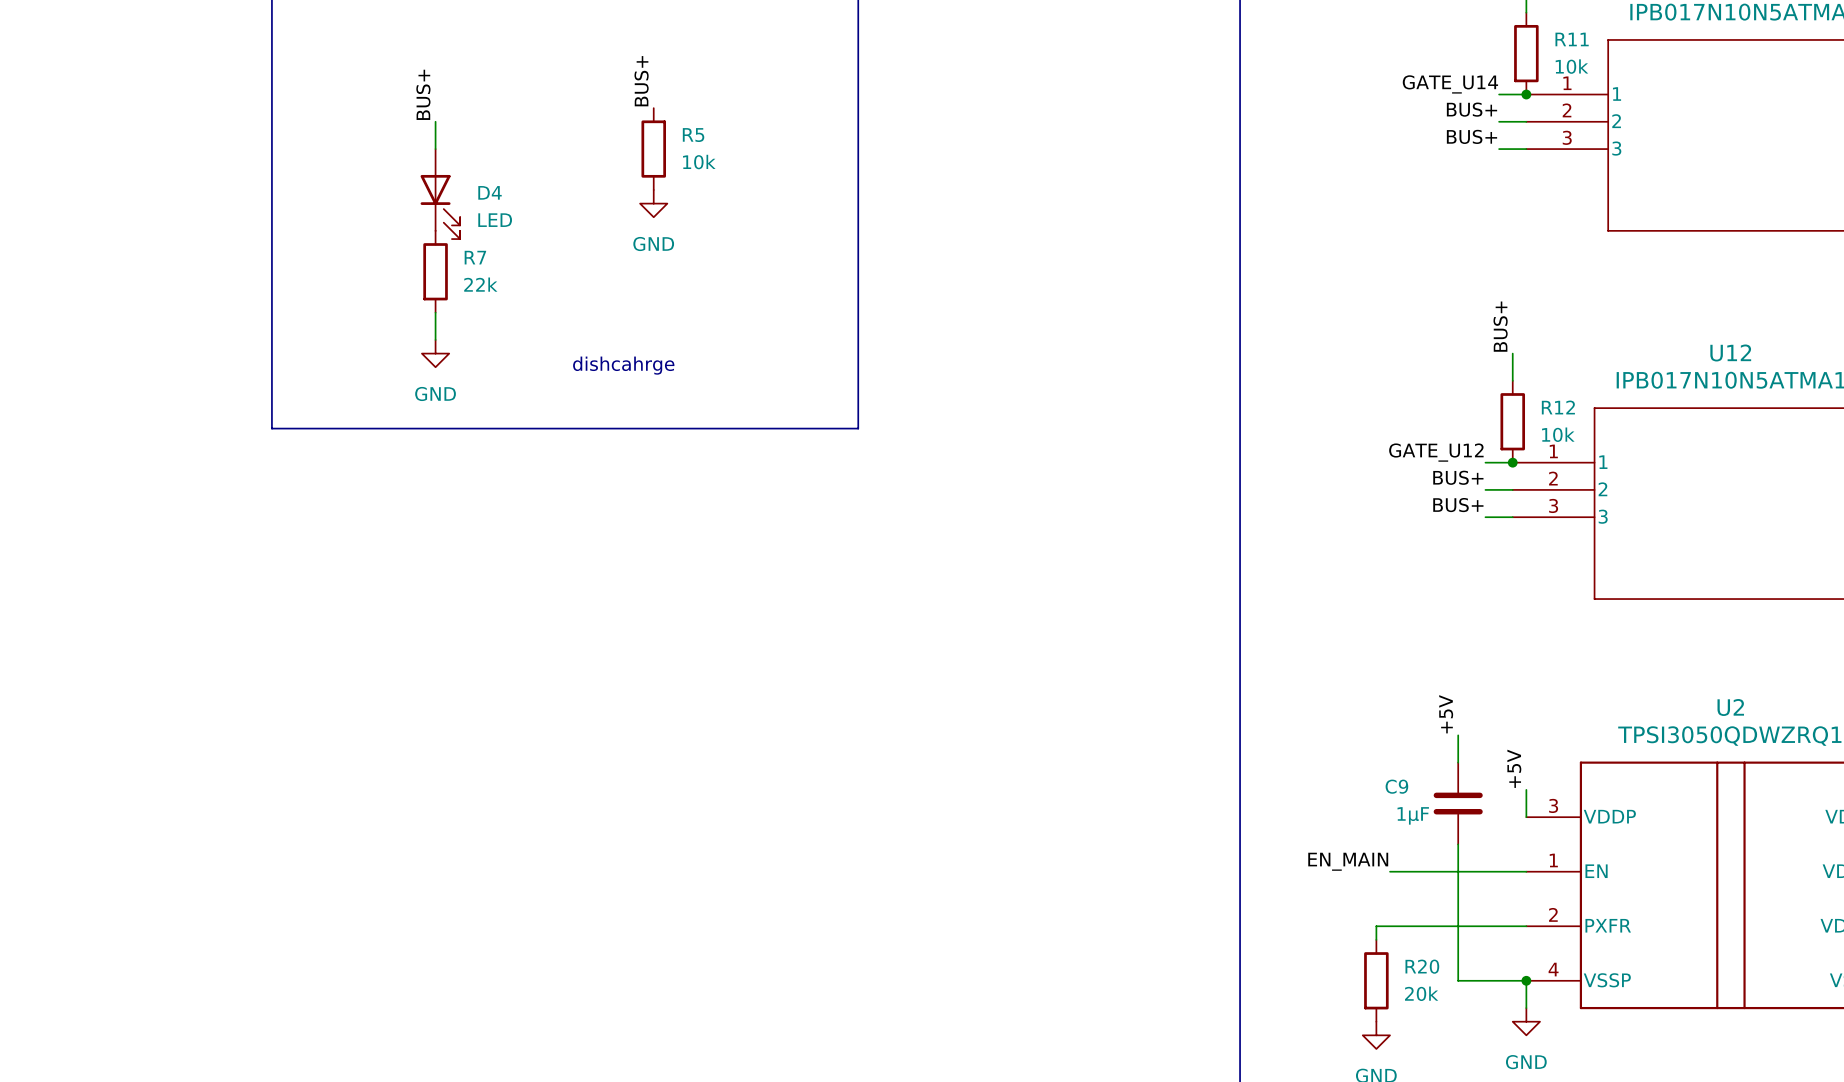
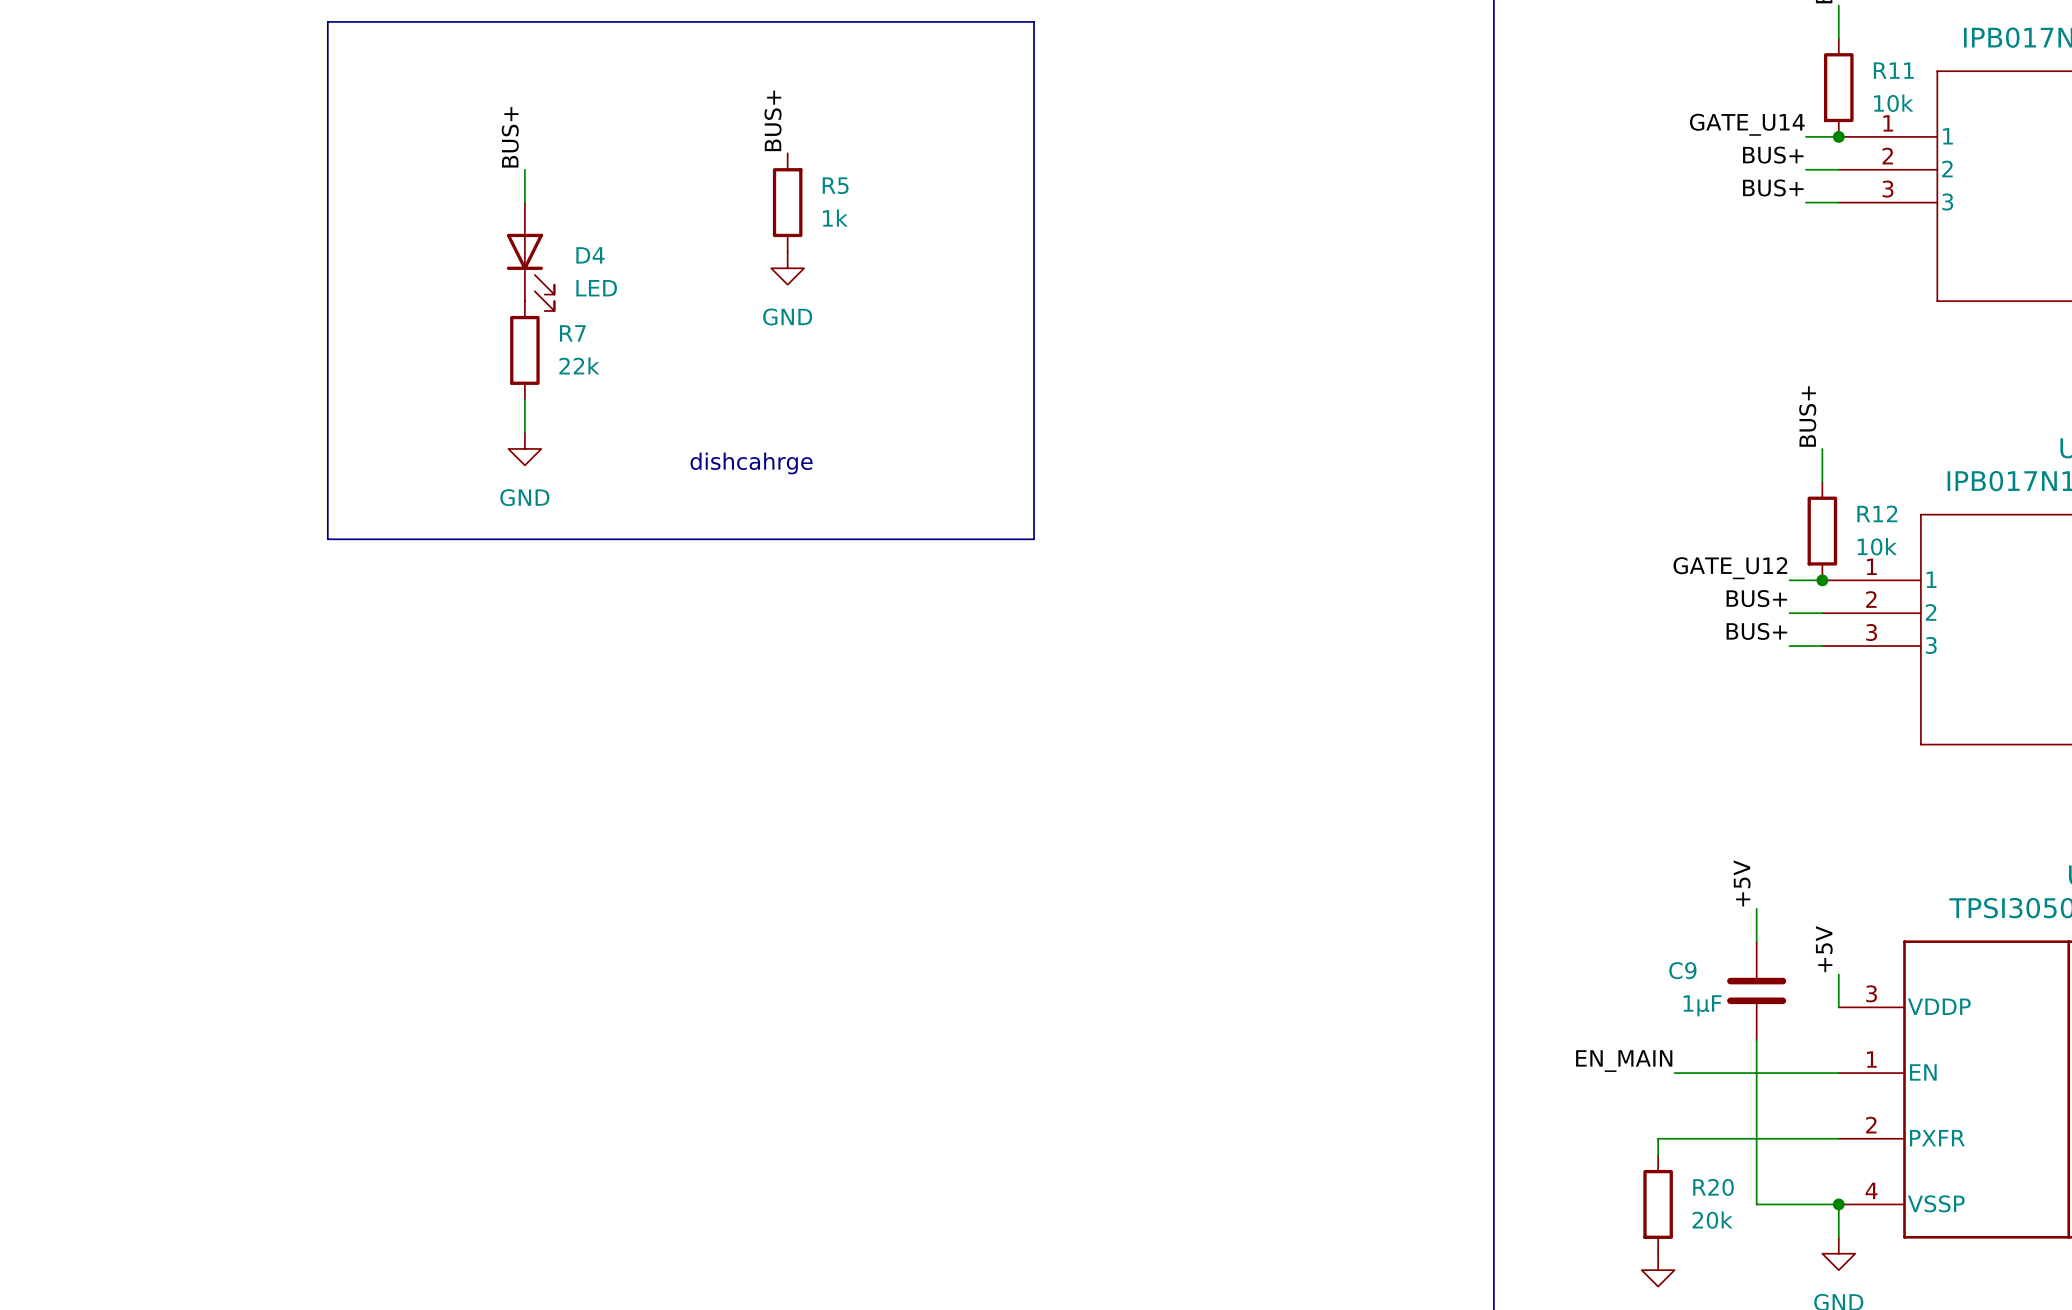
R5 value: 10k (699, 162) -> 1k (835, 218)

